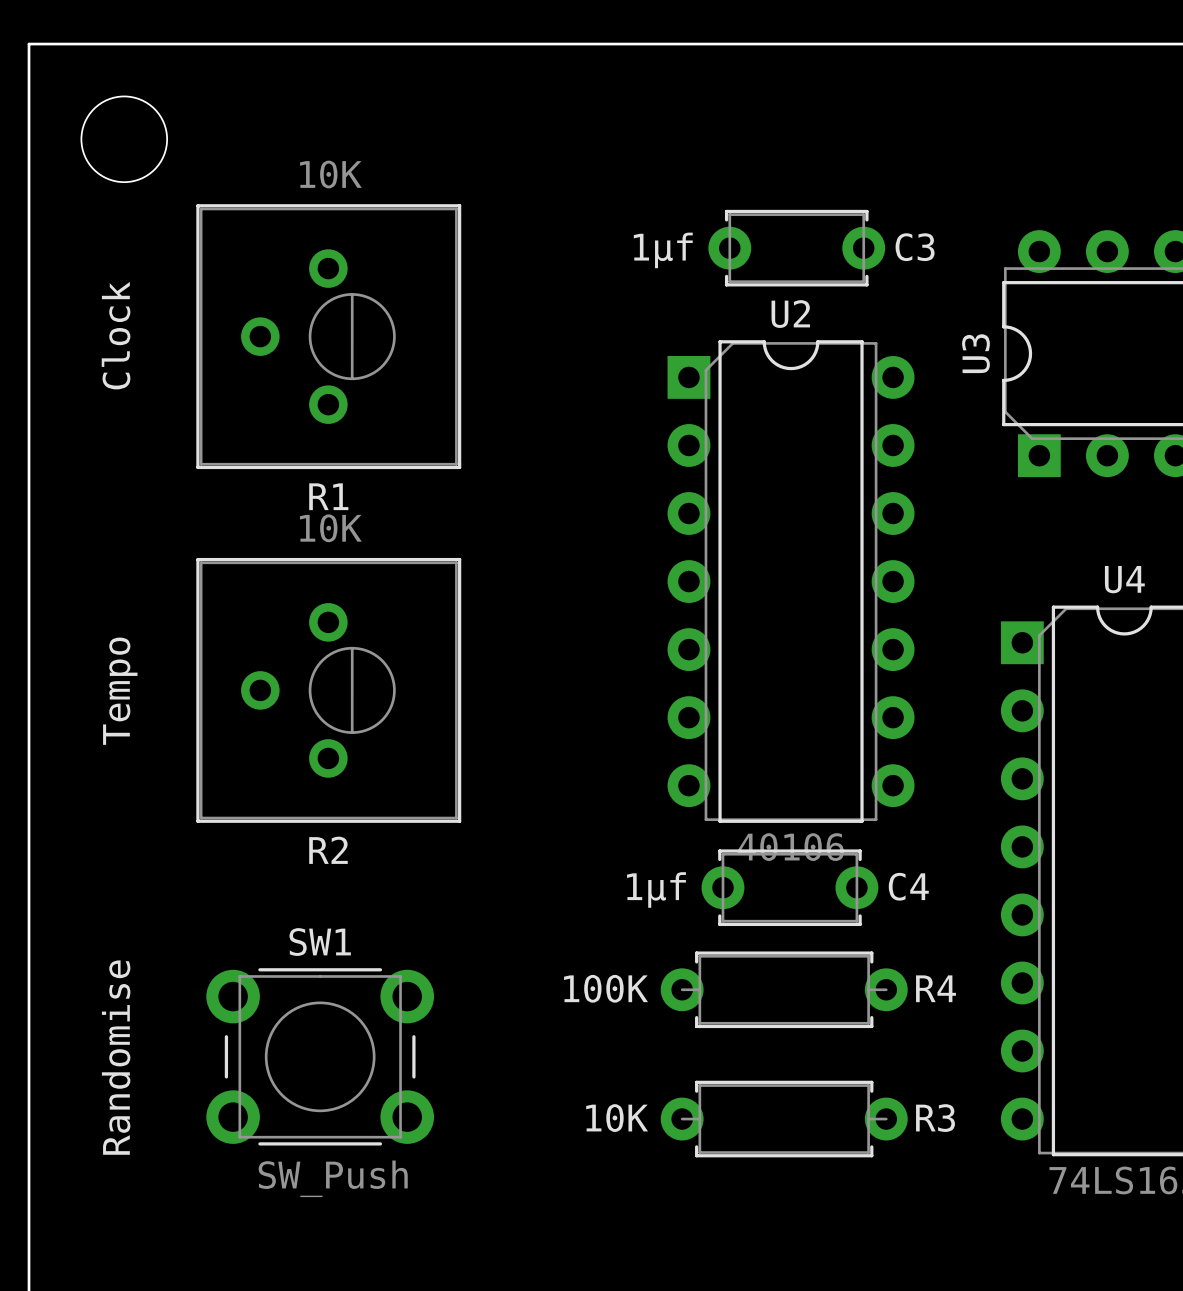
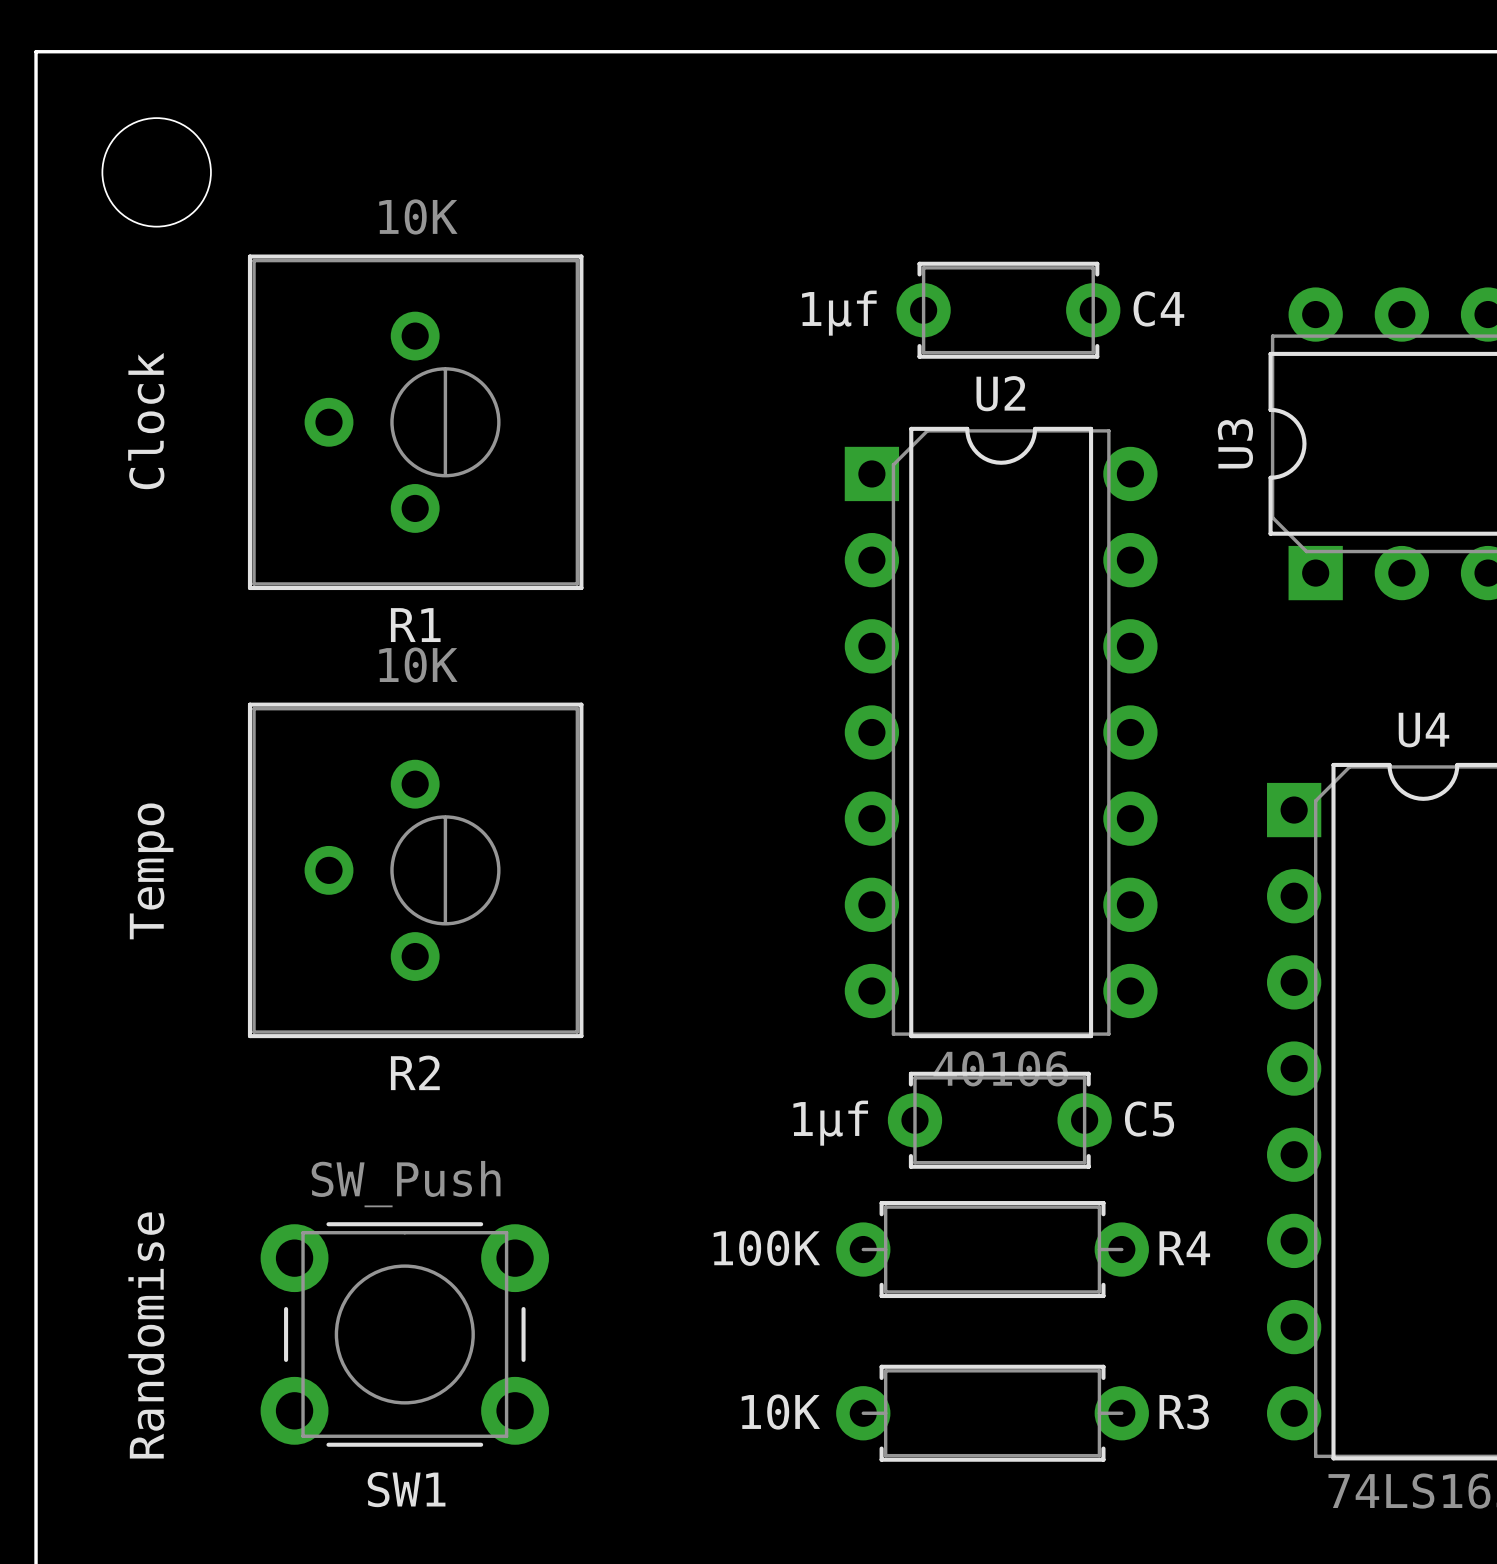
C3 name: C3 (915, 247) -> C4 (1158, 309)
C4 name: C4 (908, 886) -> C5 (1149, 1119)
SW1 name position: SW1 (320, 942) -> SW1 (406, 1489)
SW1 value position: SW_Push (333, 1178) -> SW_Push (406, 1184)

